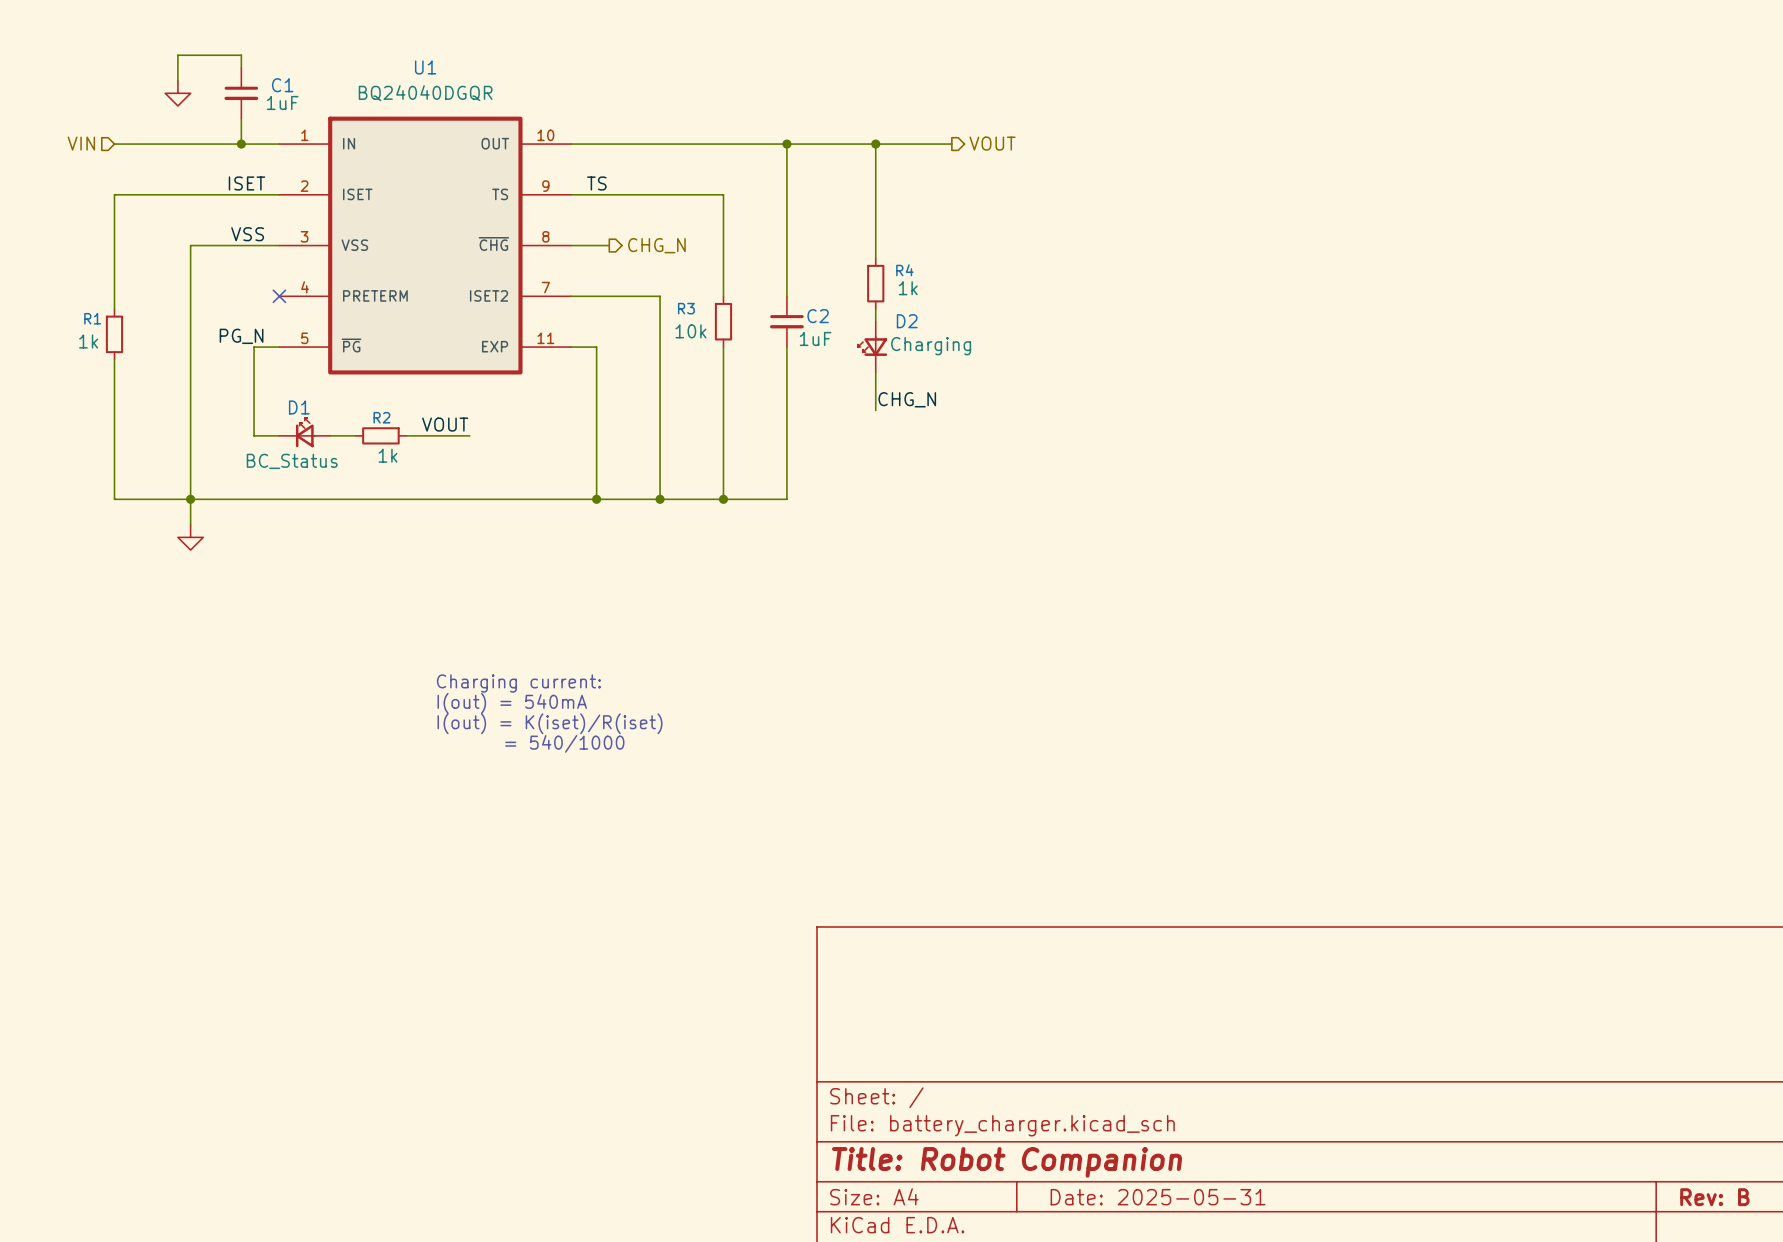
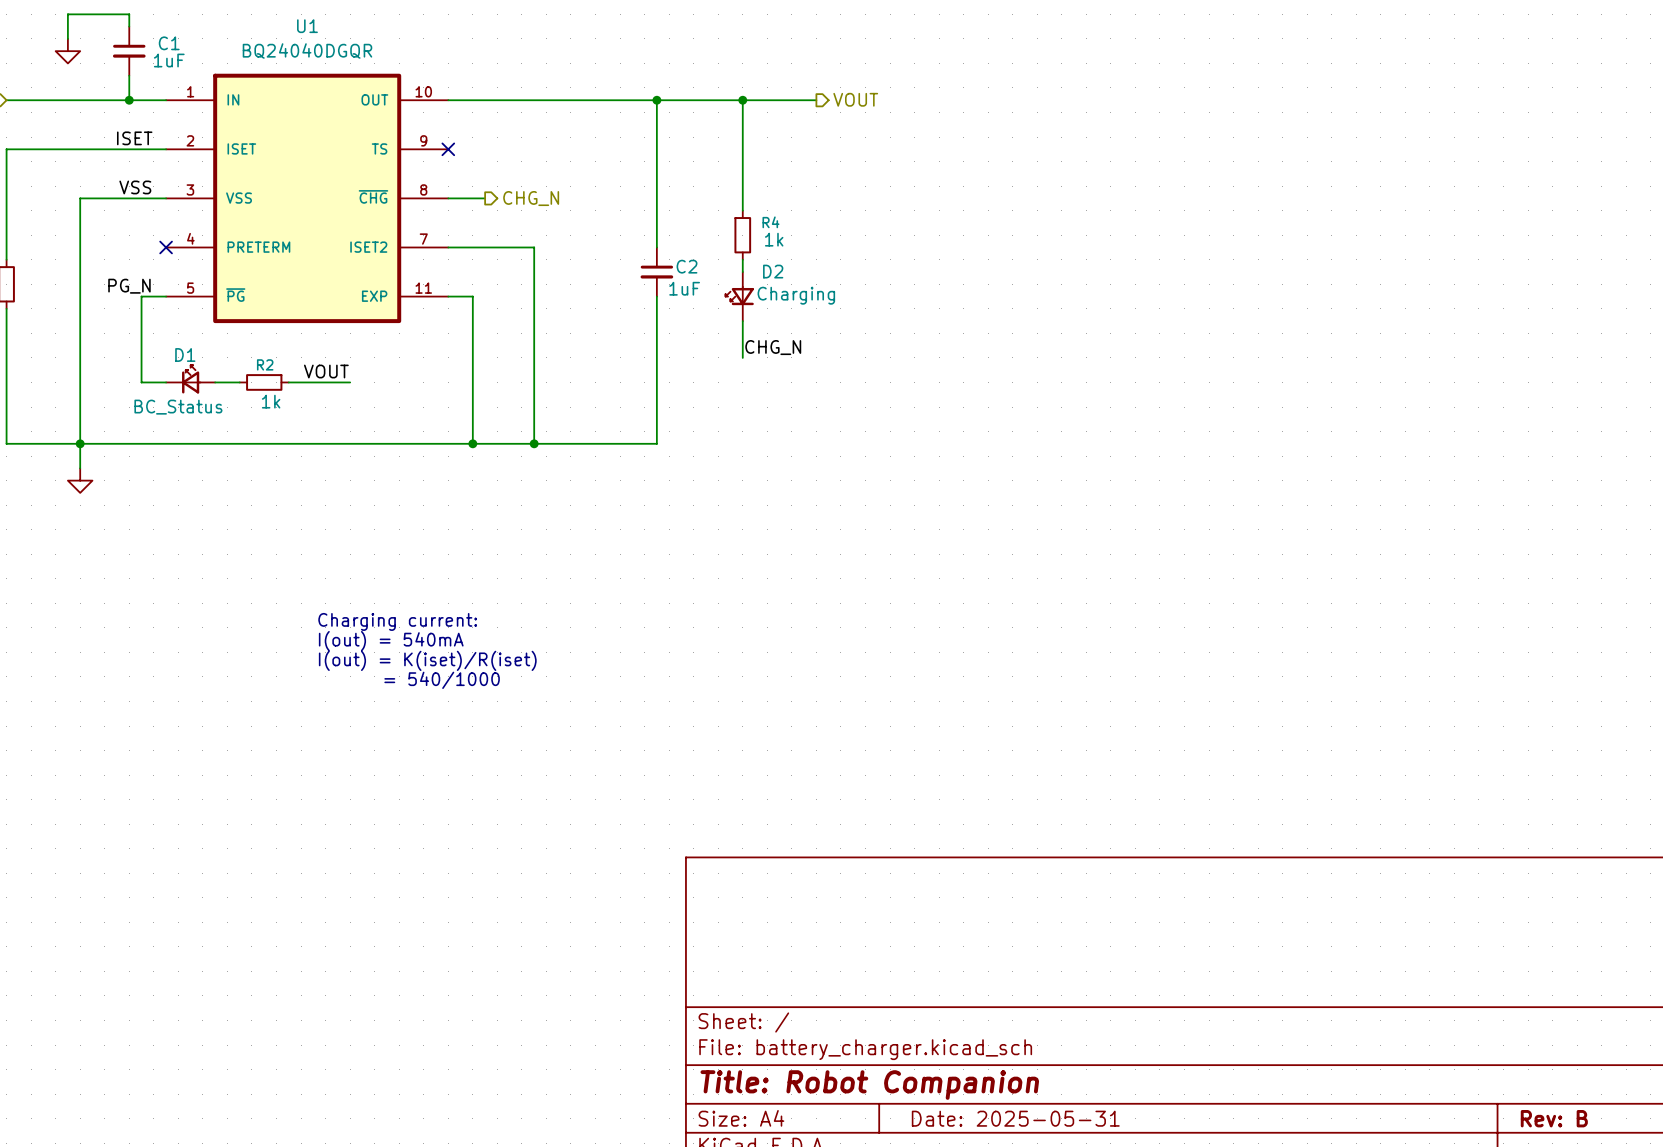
label: TS (596, 183) -> none
wire: (571, 194) (723, 194) (723, 296) -> none
no-connect mark: none -> (448, 149)
R3: 10k (723, 321) -> none
wire: (723, 347) (723, 499) -> none
junction: (723, 499) -> none

